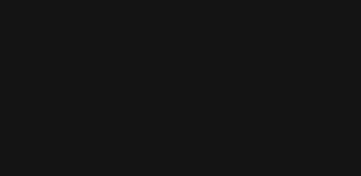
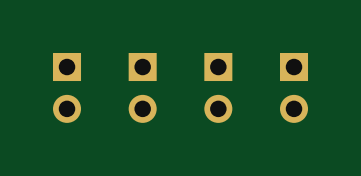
part: none -> (67, 87)
part: none -> (142, 87)
part: none -> (218, 87)
part: none -> (294, 87)

